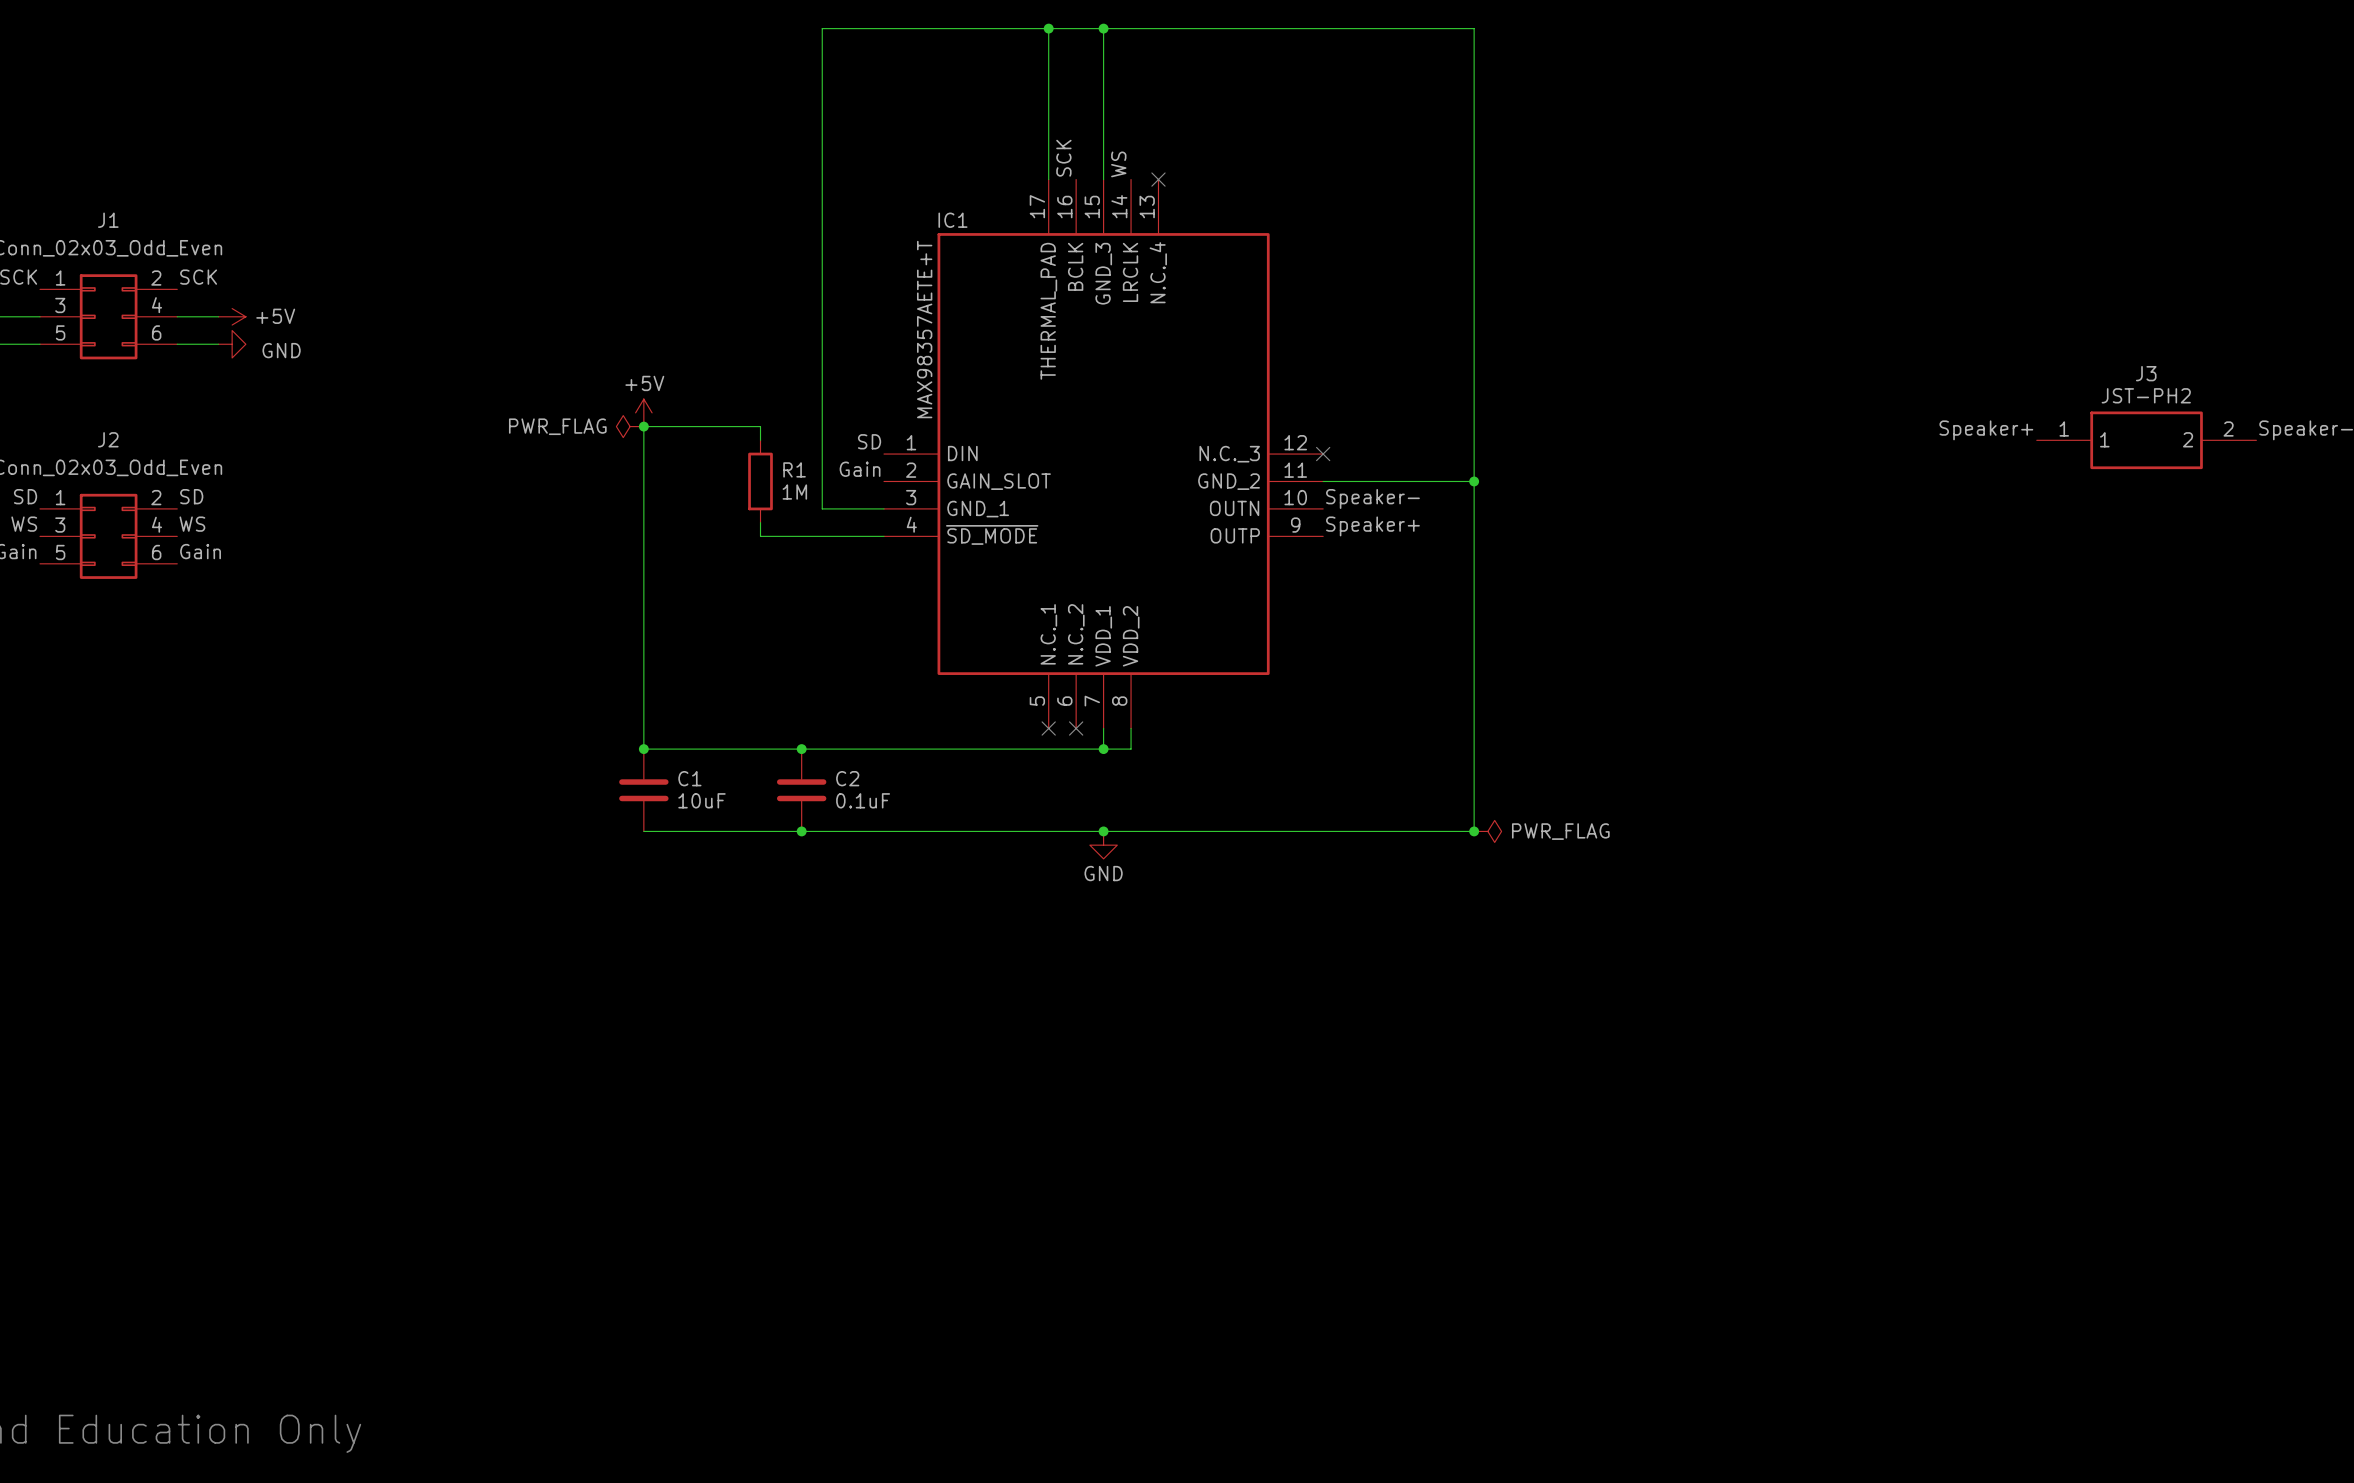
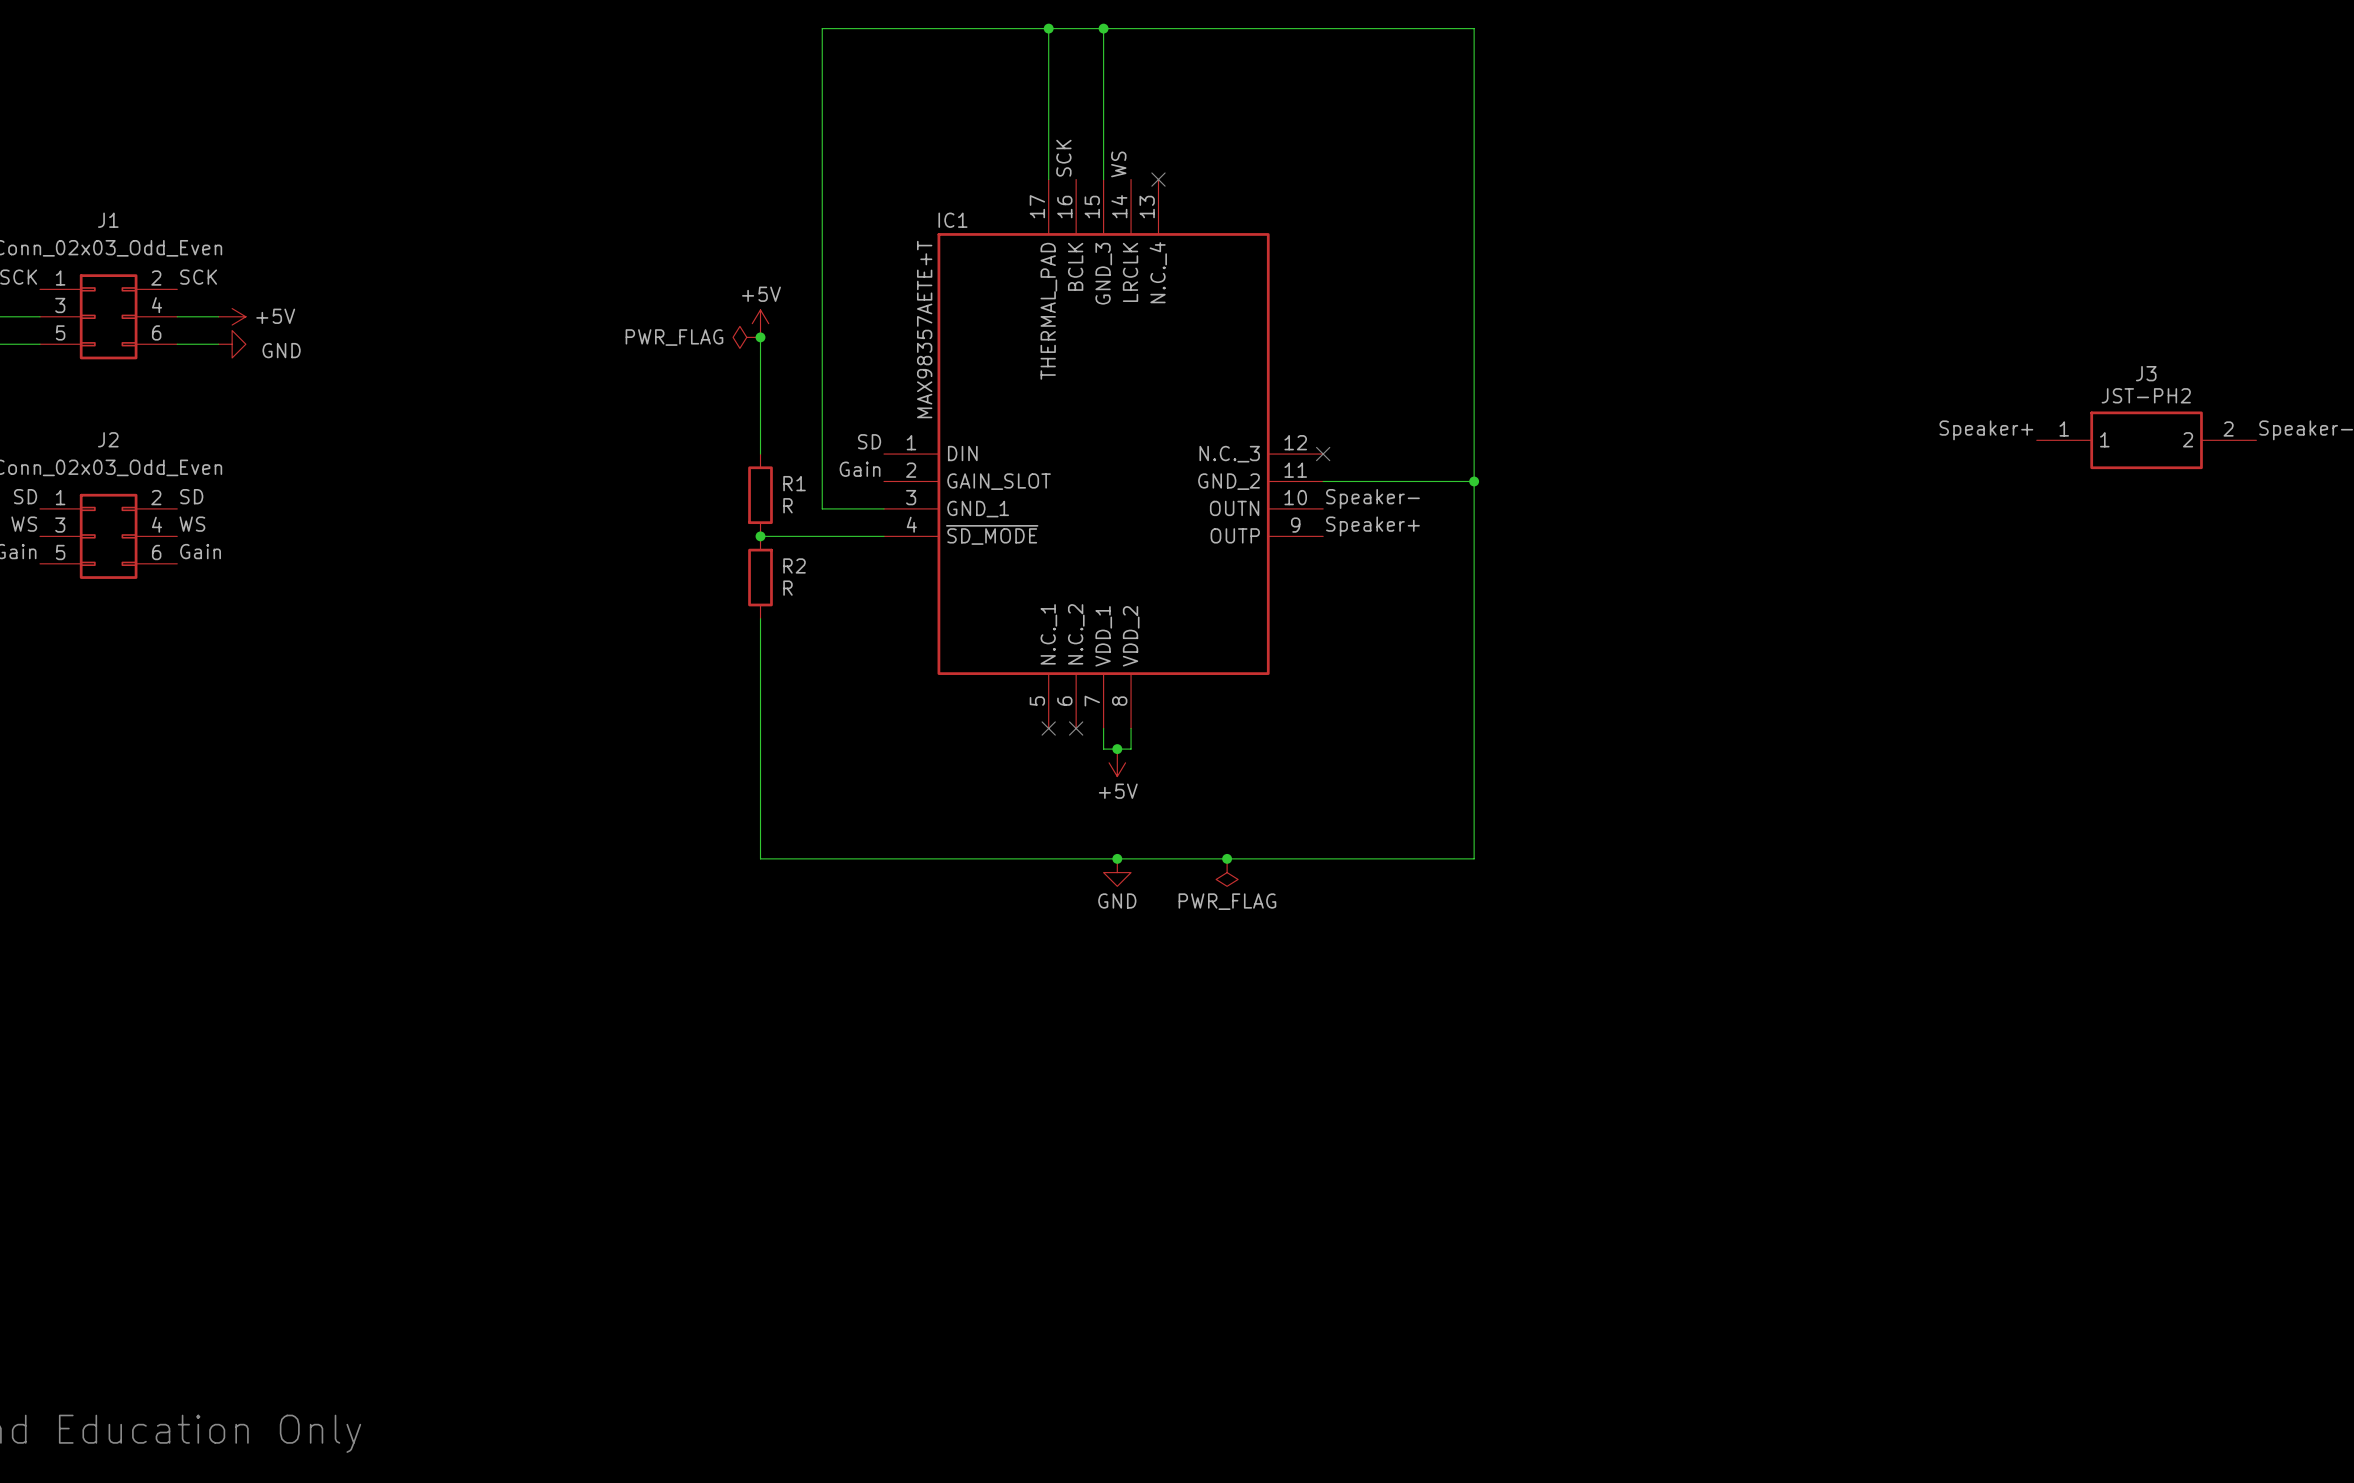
junction: none -> (760, 337)
power symbol position: +5V (643, 412) -> +5V (760, 323)
power symbol position: PWR_FLAG (630, 426) -> PWR_FLAG (746, 337)
junction: (643, 426) -> none
wire: (760, 426) (643, 426) (643, 749) (1103, 749) -> (760, 426) (760, 337)
R1 position: (760, 481) -> (760, 495)
R1 value: 1M (794, 492) -> R (787, 505)
junction: none -> (760, 536)
R2: none -> R (760, 577)
junction: (643, 749) -> none
junction: (801, 749) -> none
junction position: (1103, 749) -> (1117, 749)
power symbol: none -> +5V (1117, 762)
C1: 10uF (643, 790) -> none
C2: 0.1uF (801, 790) -> none
wire: (643, 831) (1474, 831) -> (760, 618) (760, 858) (1474, 858) (1474, 831)
junction: (801, 831) -> none
junction position: (1103, 831) -> (1117, 858)
junction: (1474, 831) -> none
power symbol rotation: 0° (1487, 831) -> 90° clockwise (1227, 872)
power symbol position: PWR_FLAG (1487, 831) -> PWR_FLAG (1227, 872)
power symbol text position: PWR_FLAG (1560, 831) -> PWR_FLAG (1227, 901)
power symbol position: GND (1103, 845) -> GND (1117, 872)
junction: none -> (1227, 858)

